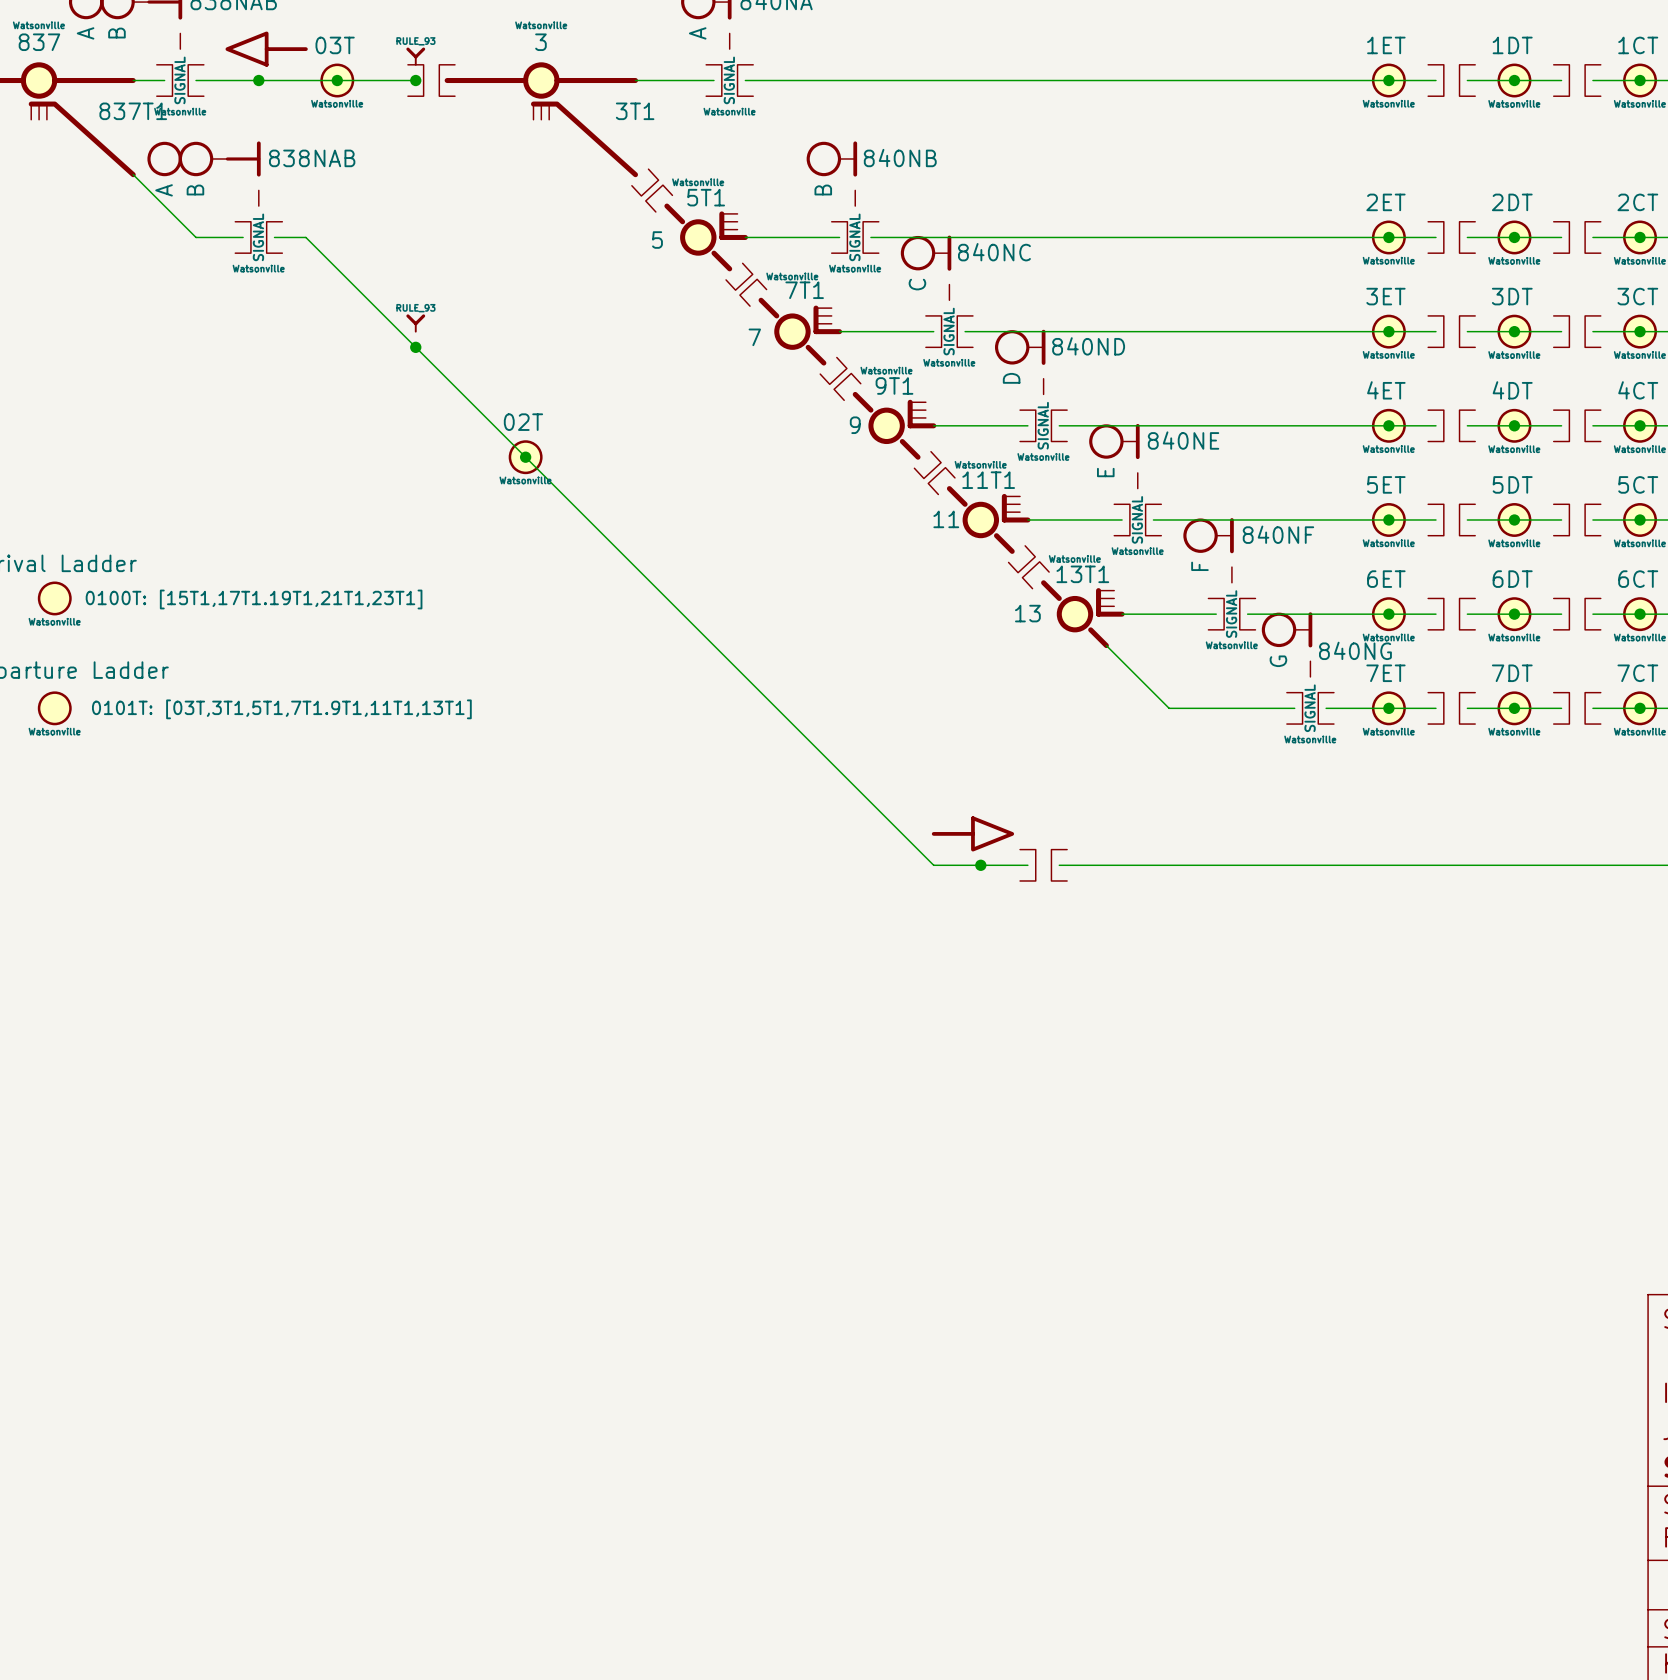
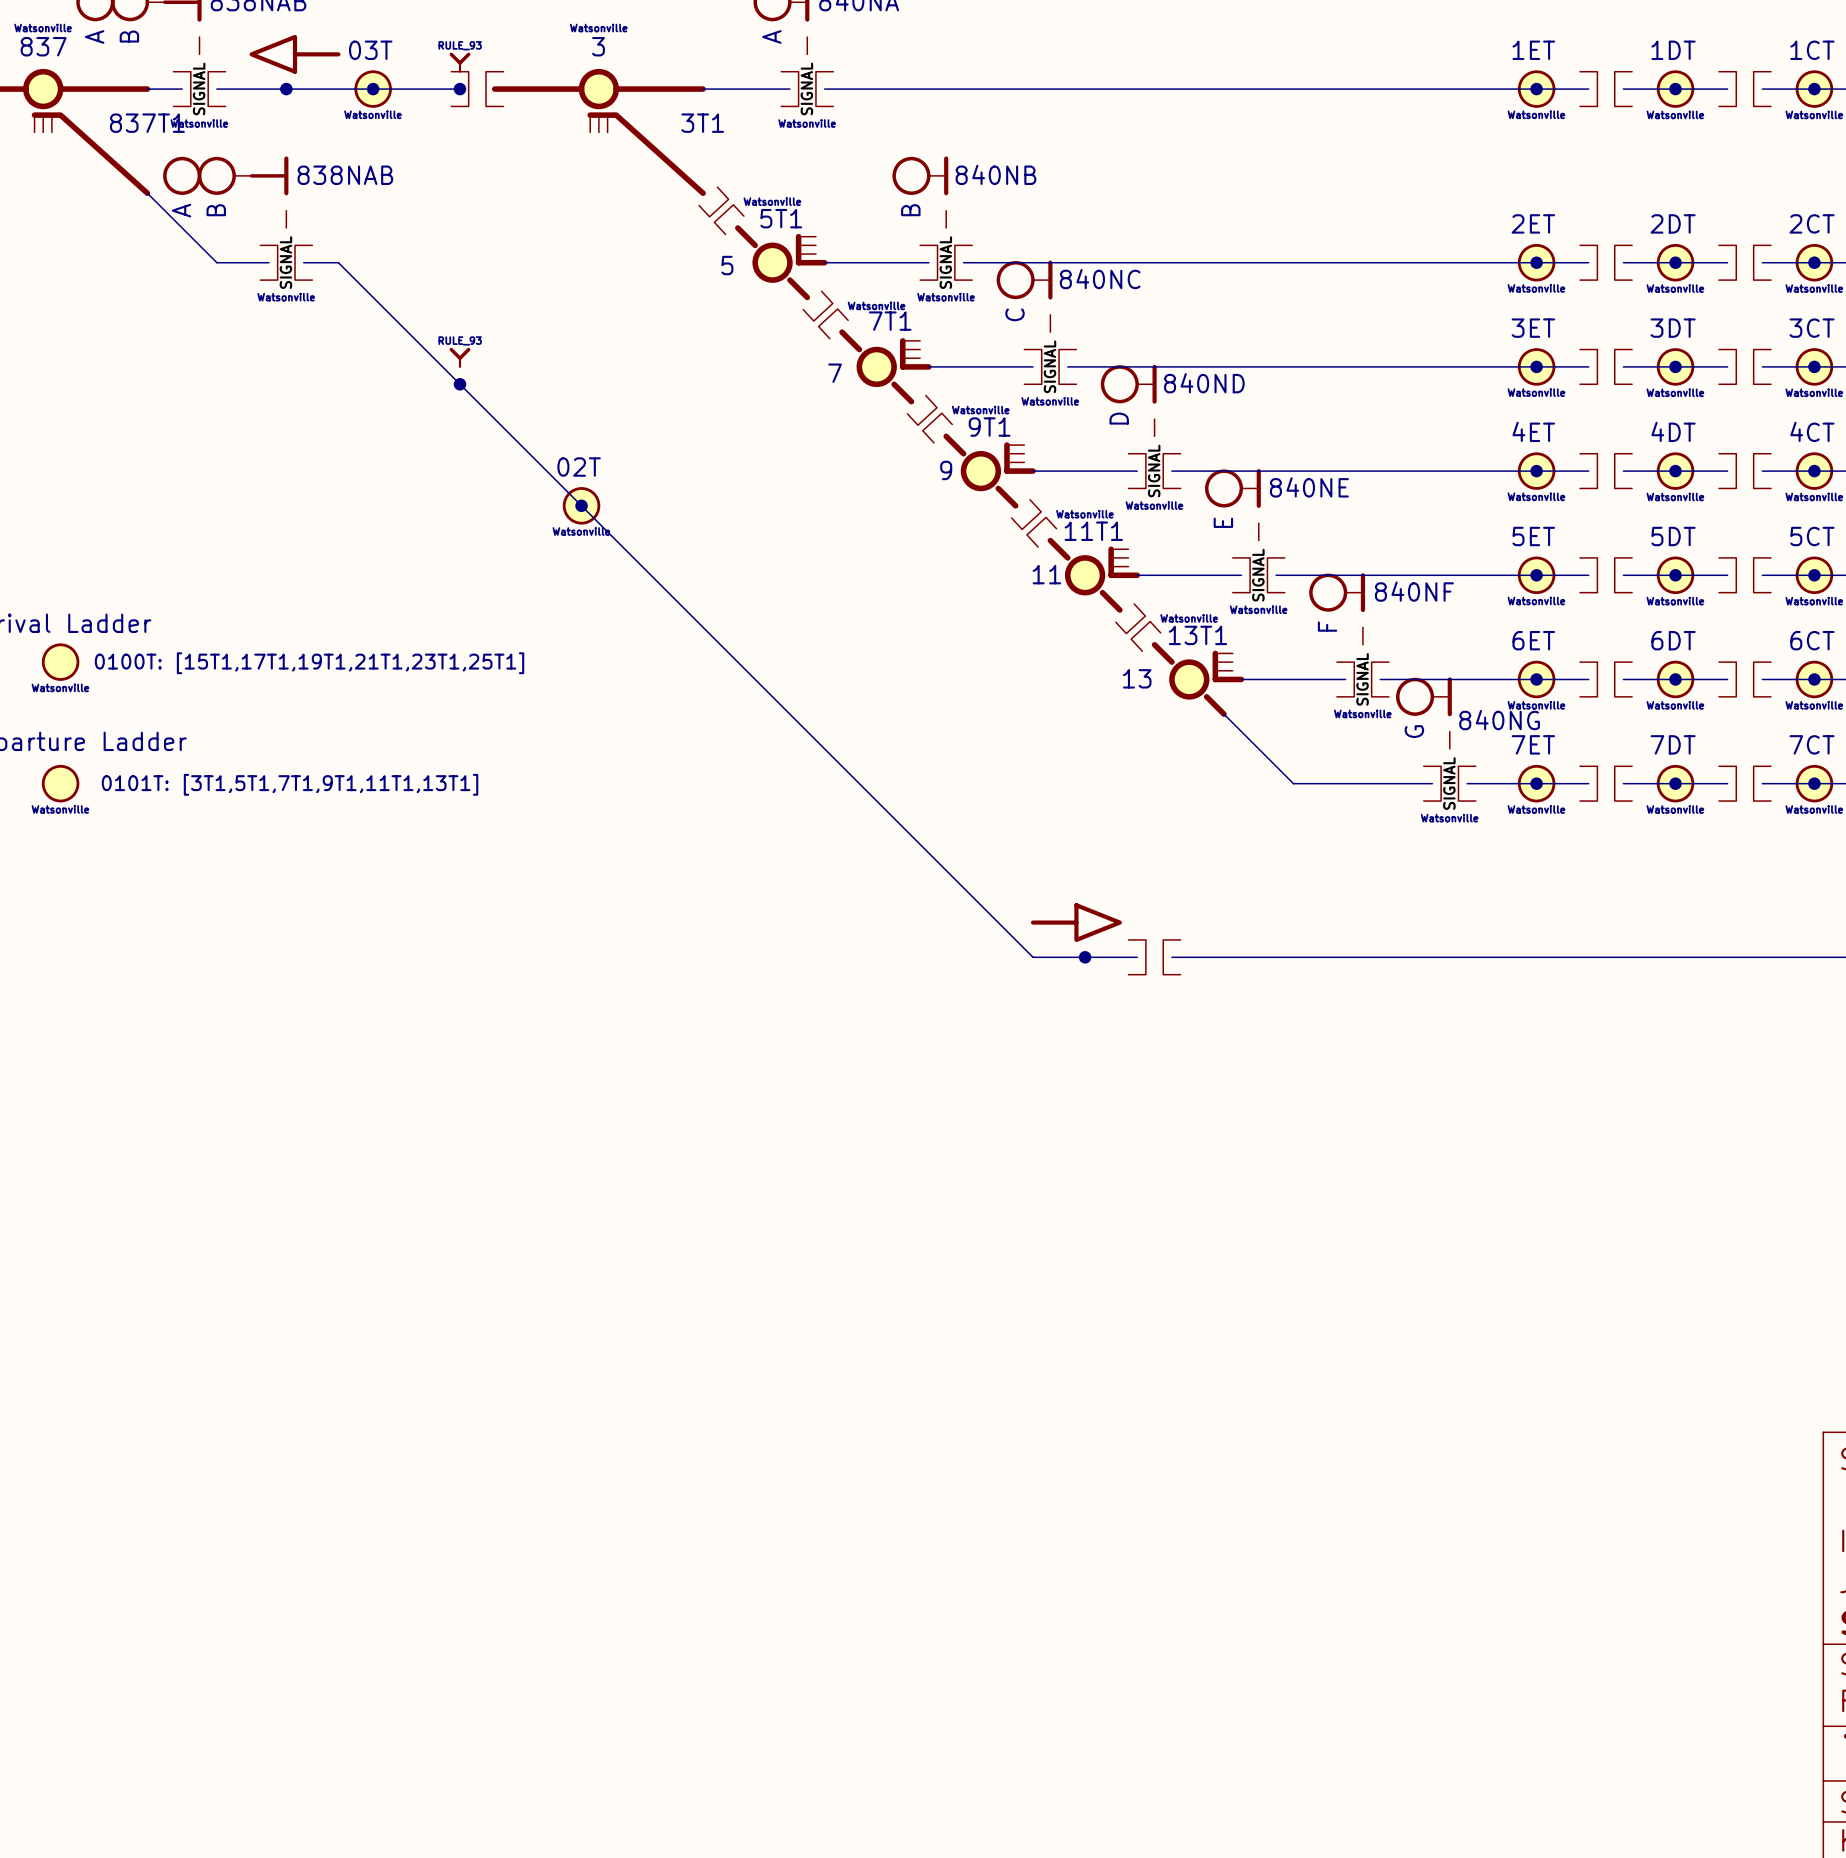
part text: 0100T: [15T1,17T1.19T1,21T1,23T1] (254, 599) -> 0100T: [15T1,17T1,19T1,21T1,23T1,25T1] (309, 663)
part text: 0101T: [03T,3T1,5T1,7T1.9T1,11T1,13T1] (281, 709) -> 0101T: [3T1,5T1,7T1,9T1,11T1,13T1] (290, 784)

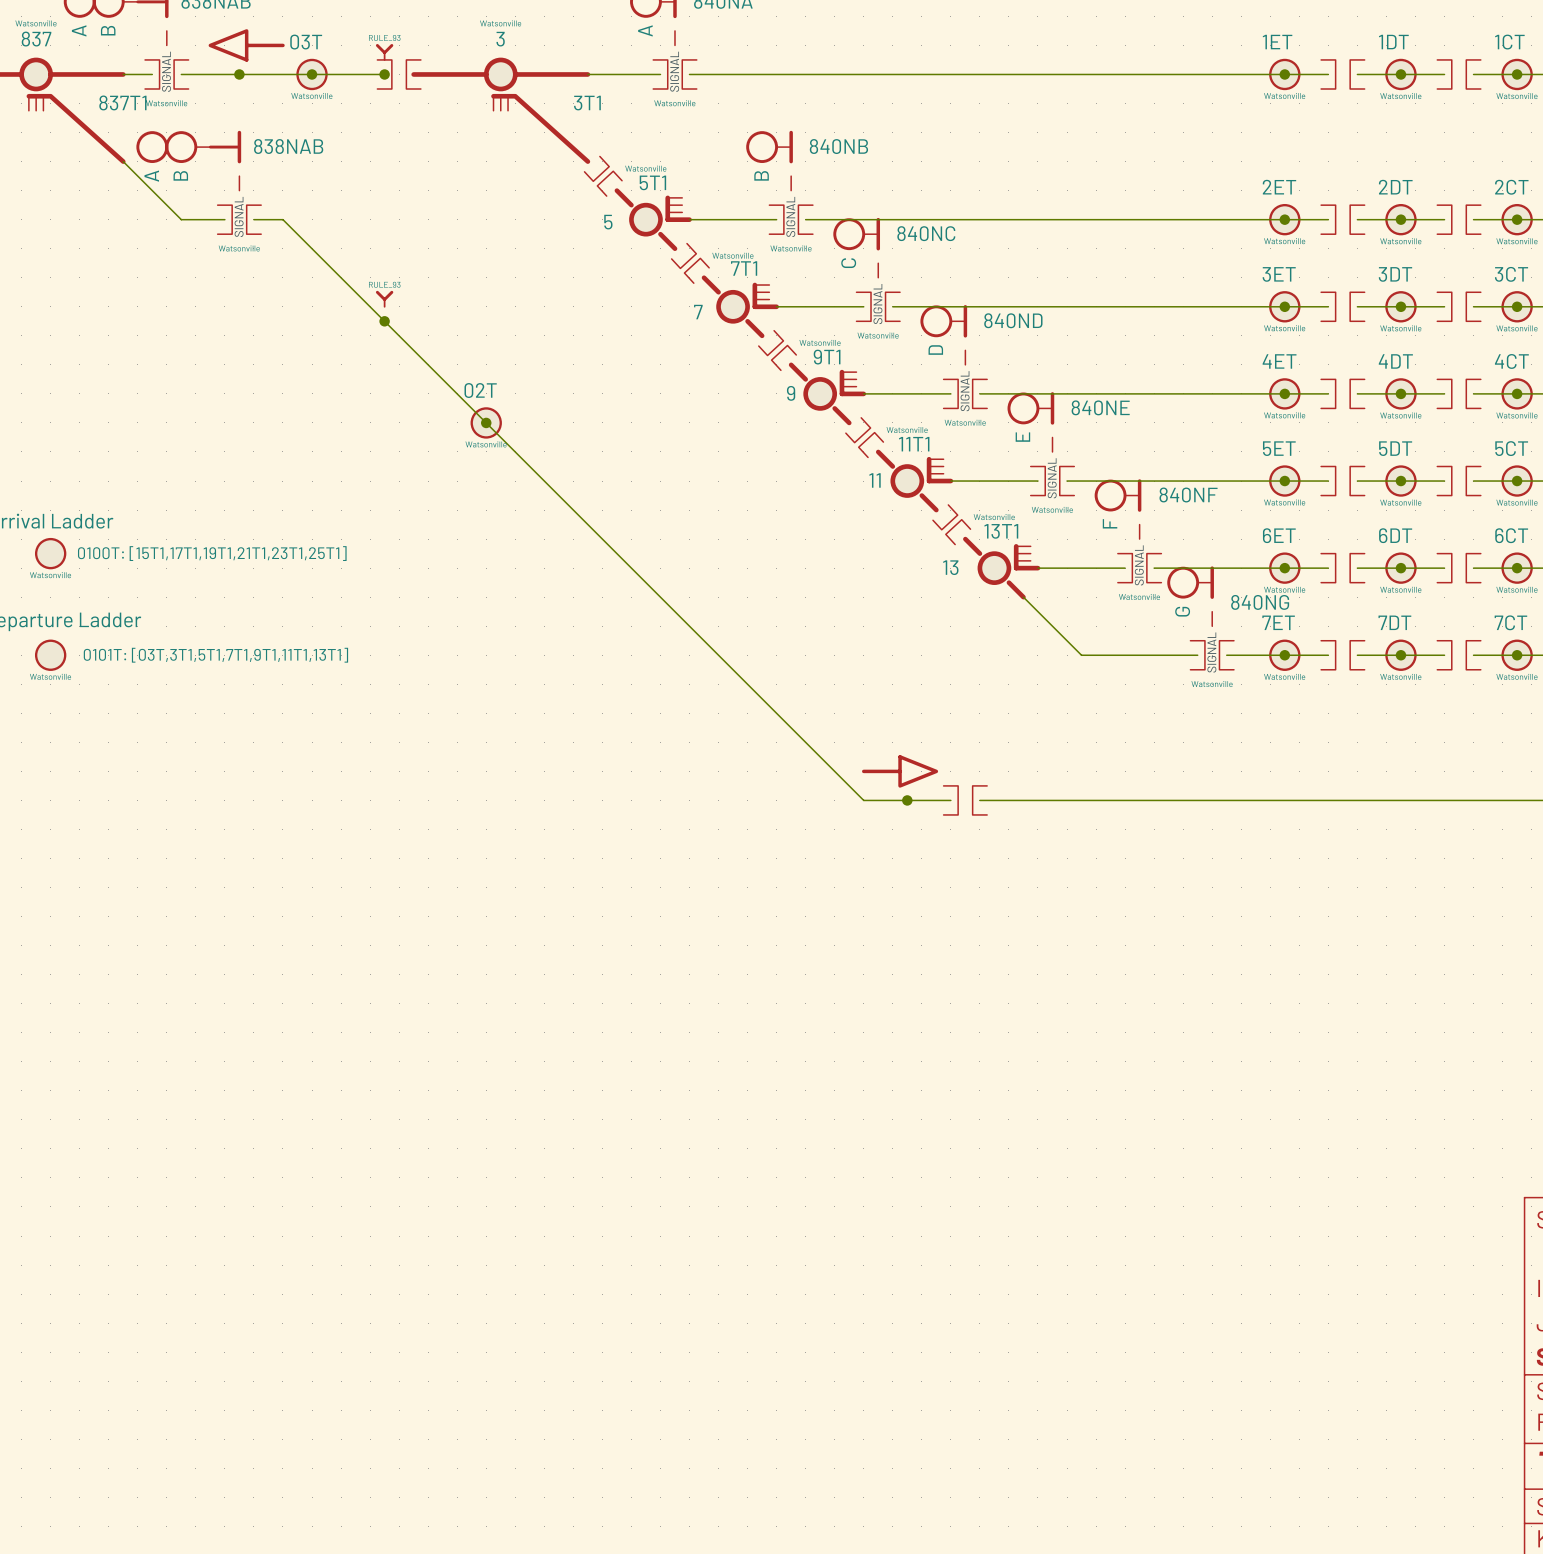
part text: 0101T: [3T1,5T1,7T1,9T1,11T1,13T1] (290, 784) -> 0101T: [03T,3T1,5T1,7T1,9T1,11T1,13T1] (215, 655)

